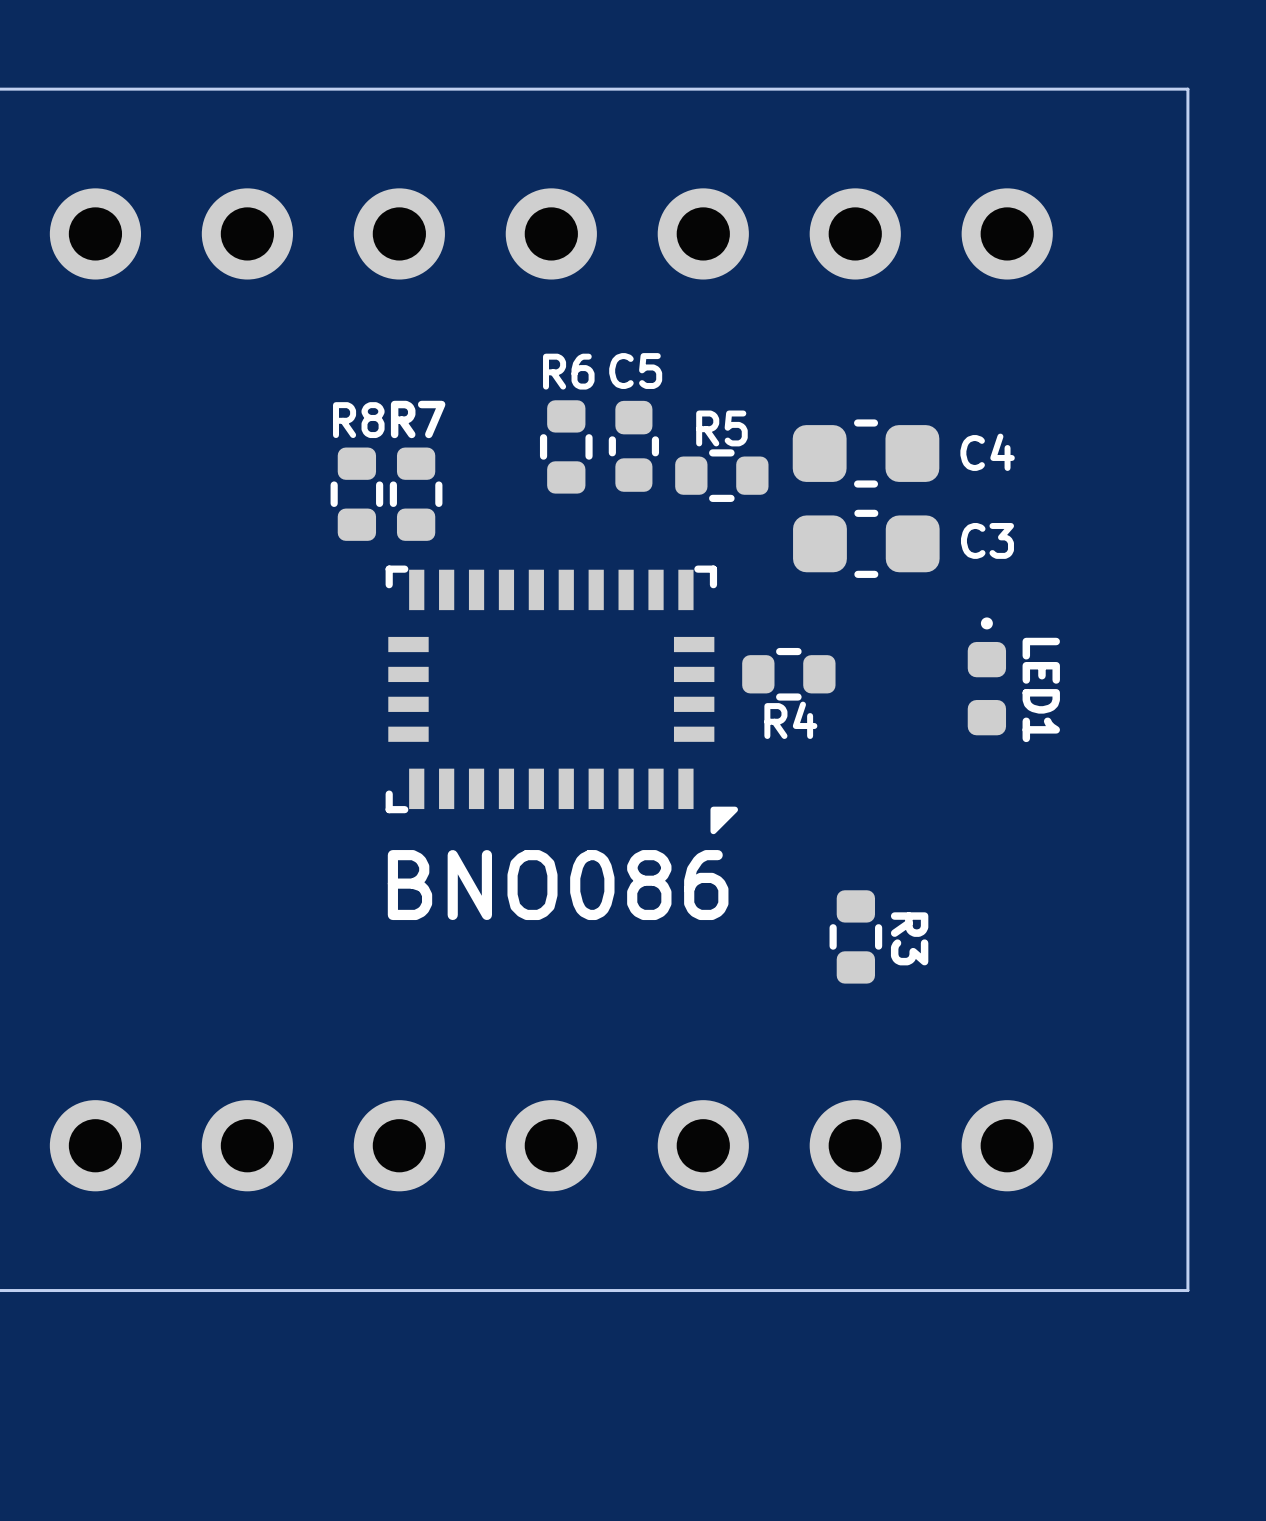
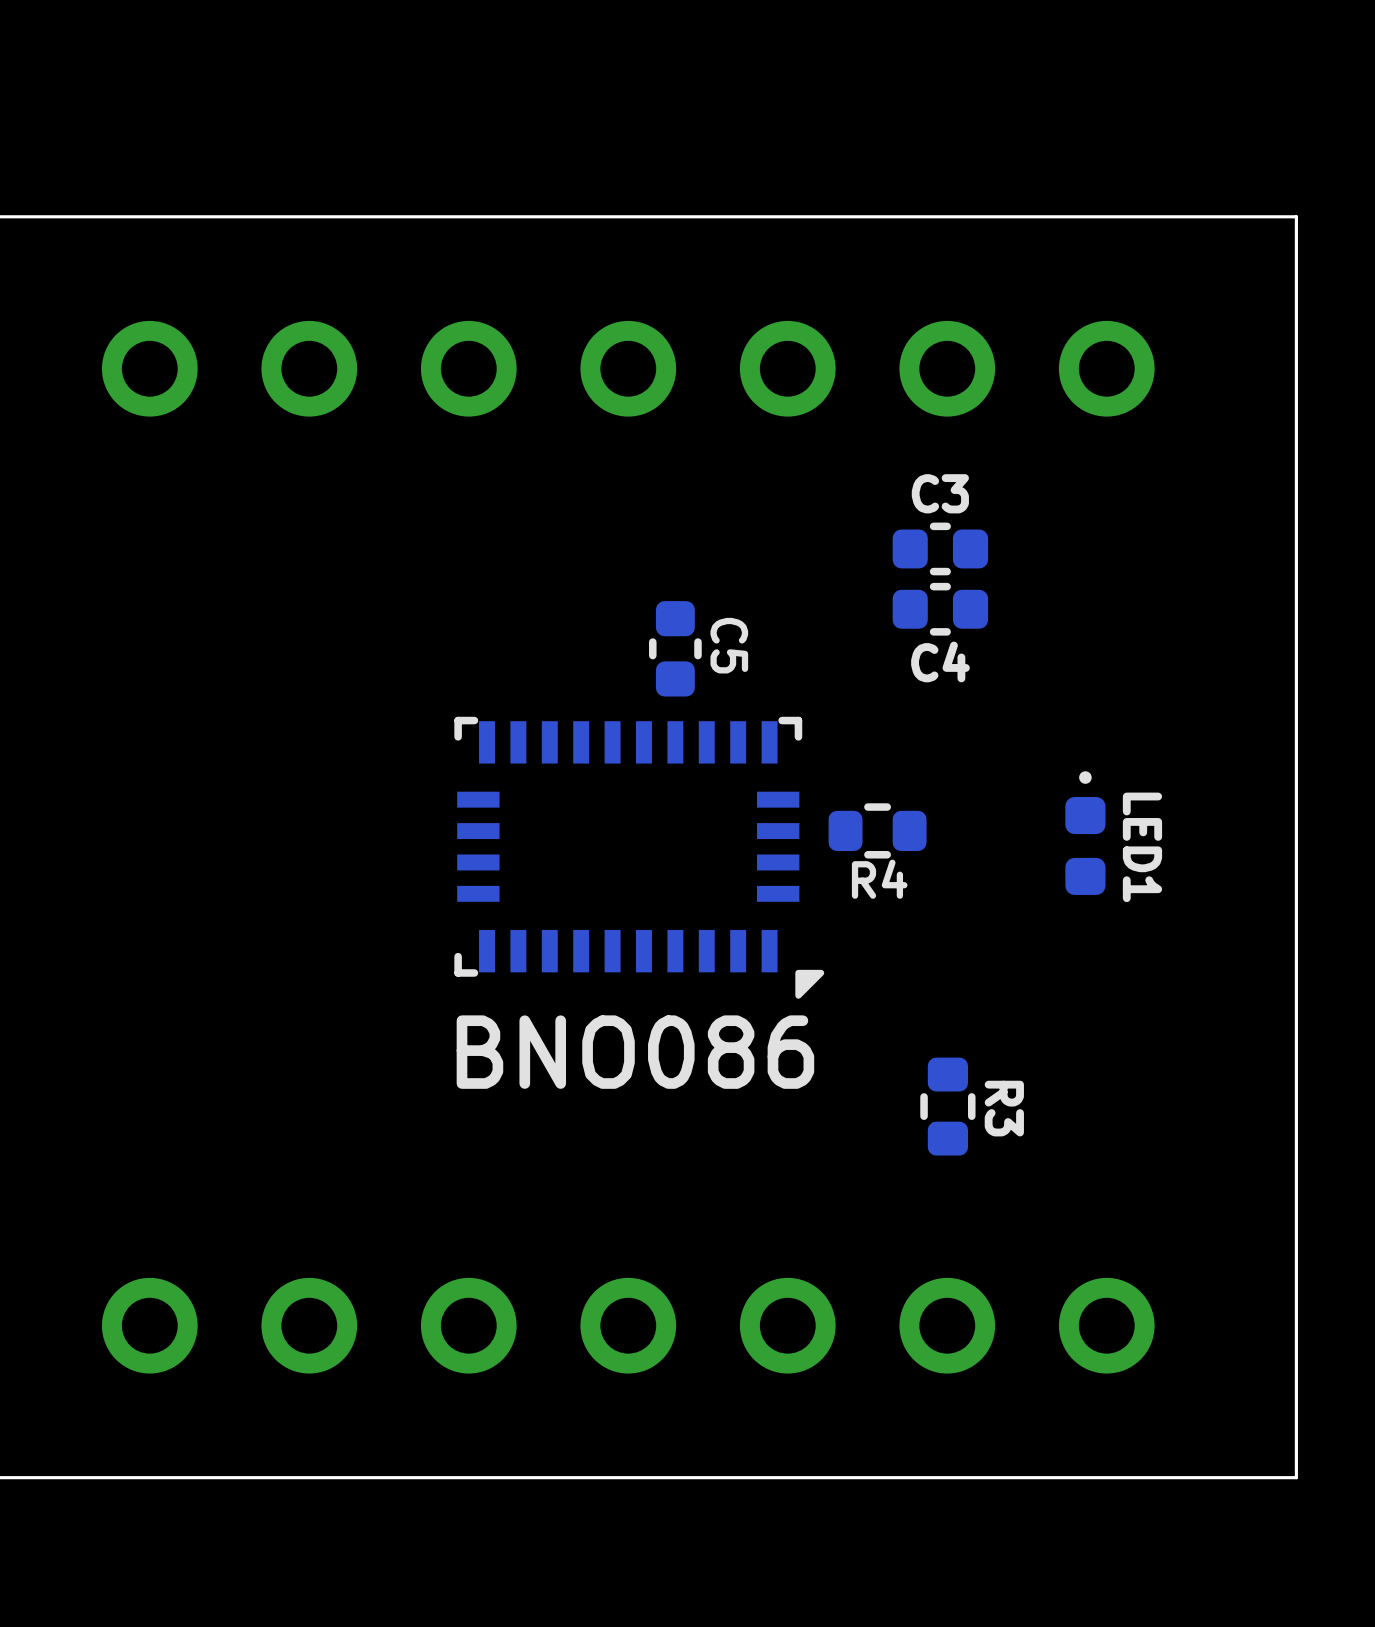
C5 name rotation: 0° (635, 371) -> 90° clockwise (729, 645)
C5 name position: C5 (635, 371) -> C5 (729, 645)
C4 footprint: [792, 419, 940, 488] -> [892, 582, 989, 636]
R6: (566, 446) -> none
C5 position: (633, 446) -> (675, 648)
C4 name position: C4 (987, 452) -> C4 (940, 661)
R5: (721, 475) -> none
R8: (356, 494) -> none
R7: (416, 494) -> none
C3 footprint: [793, 509, 940, 578] -> [892, 522, 989, 576]
C3 name position: C3 (987, 540) -> C3 (940, 493)

